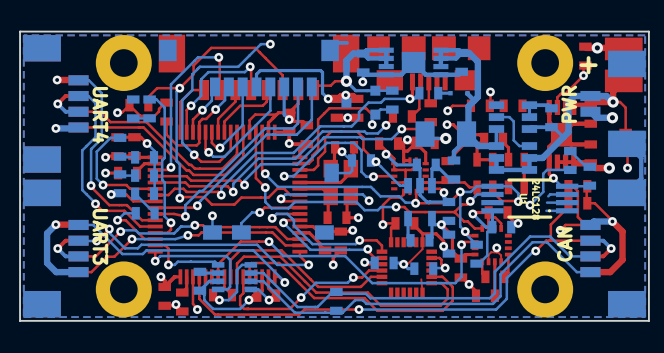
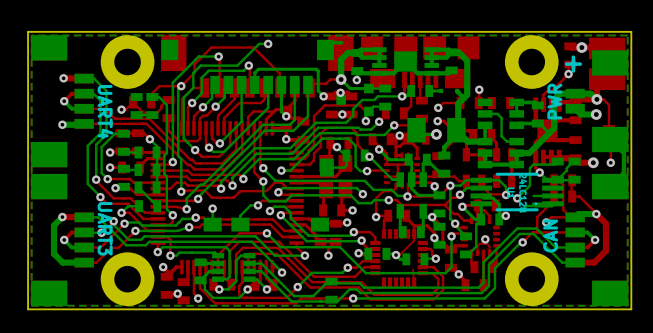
bottom track: (570, 151) (586, 166) (588, 166) -> (557, 179) (573, 161)
part position: (570, 160) -> (557, 170)
bottom track: (567, 194) (550, 194) (548, 196) -> none
bottom track: none -> (483, 198) (493, 198) (499, 204) (499, 219)
bottom track: none -> (552, 206) (526, 206) (520, 211)

